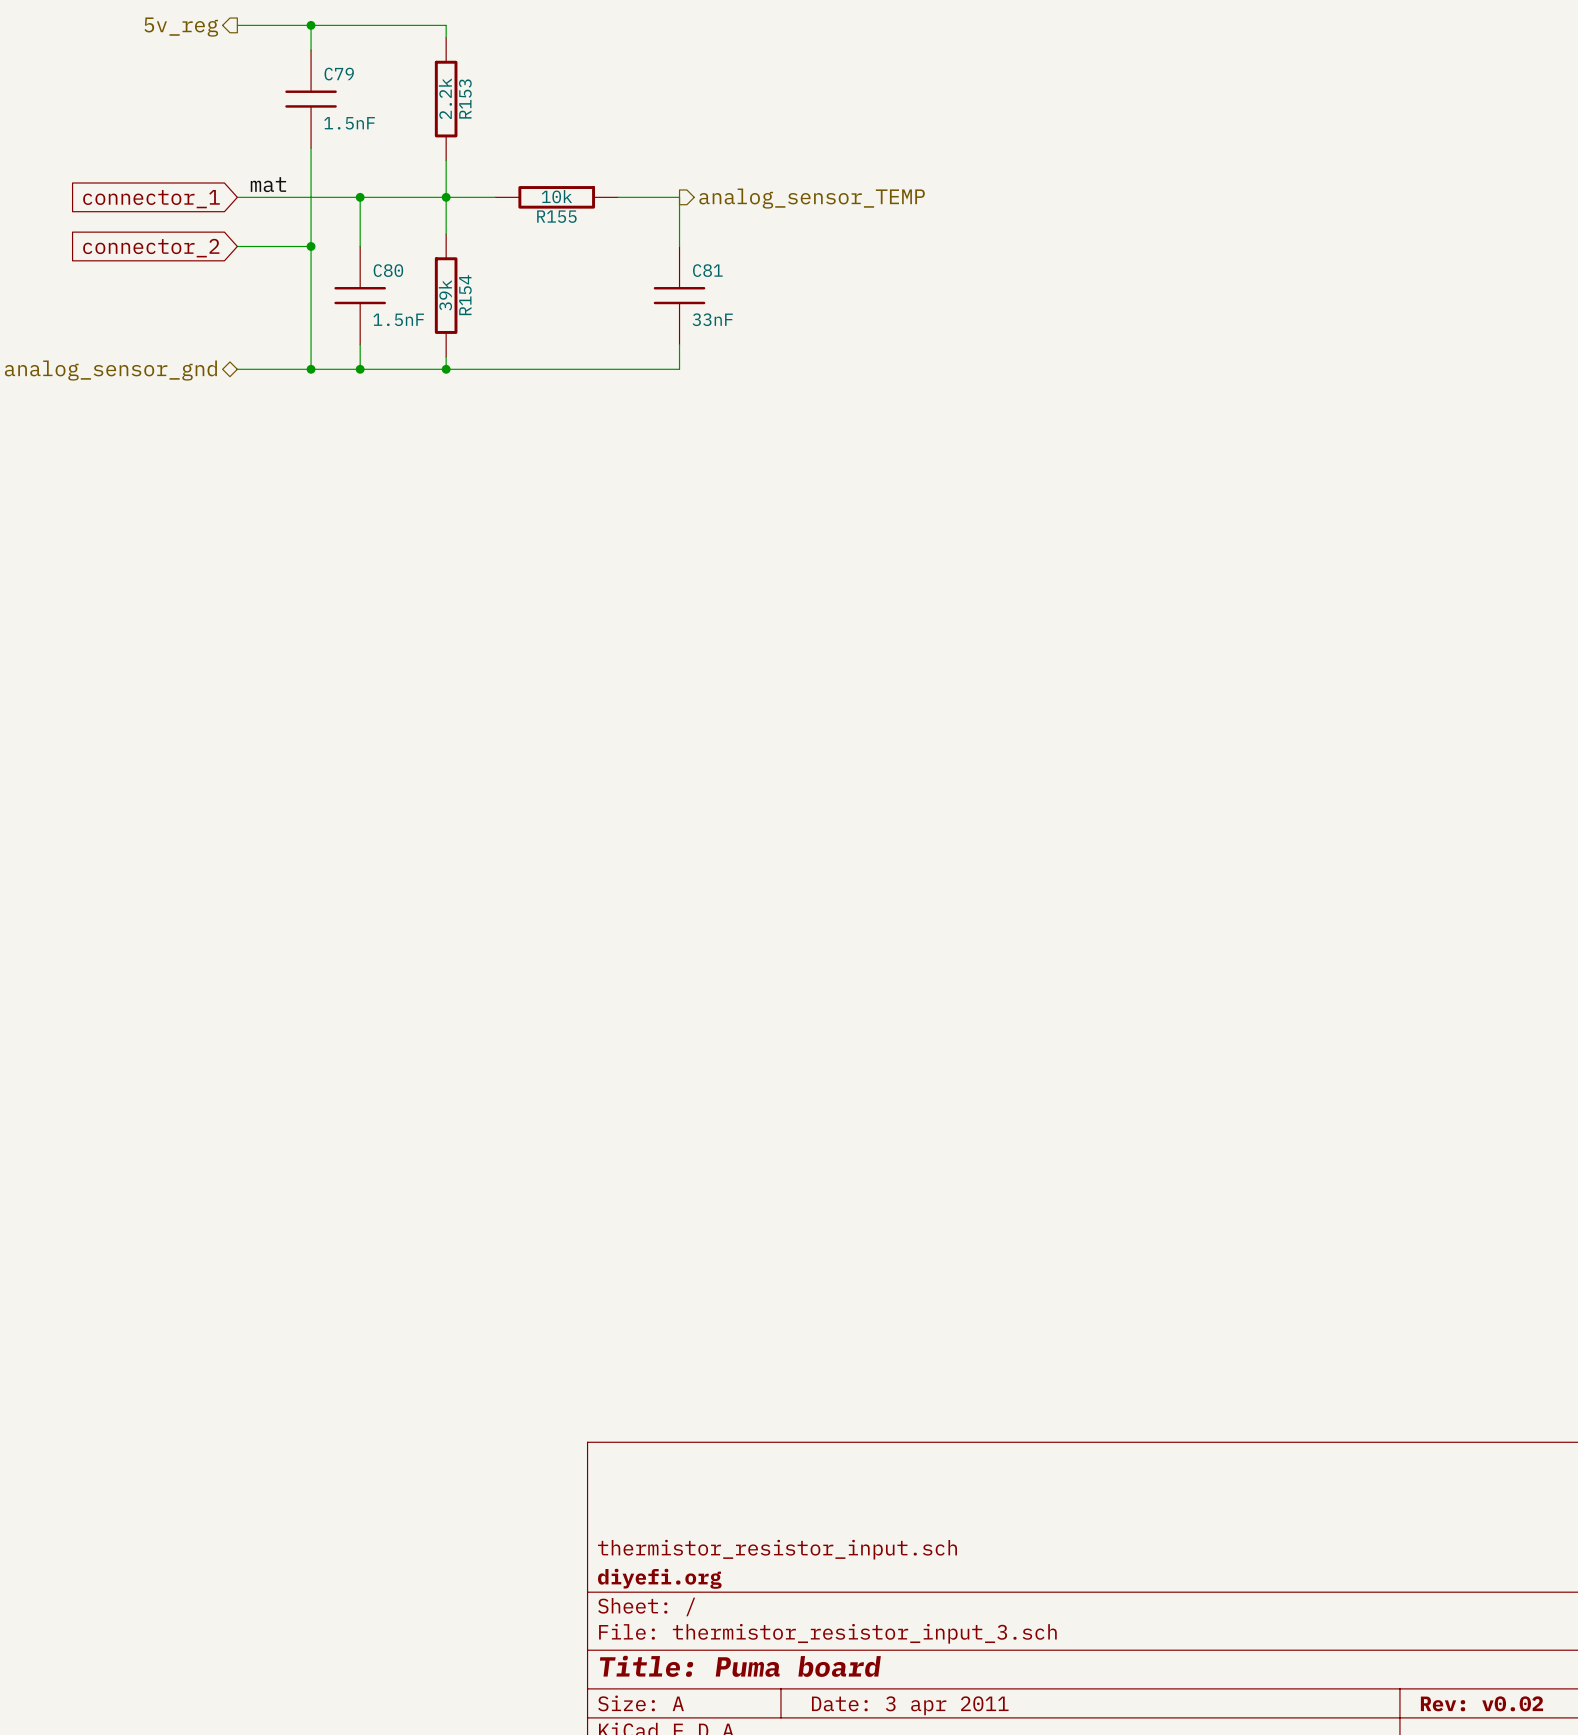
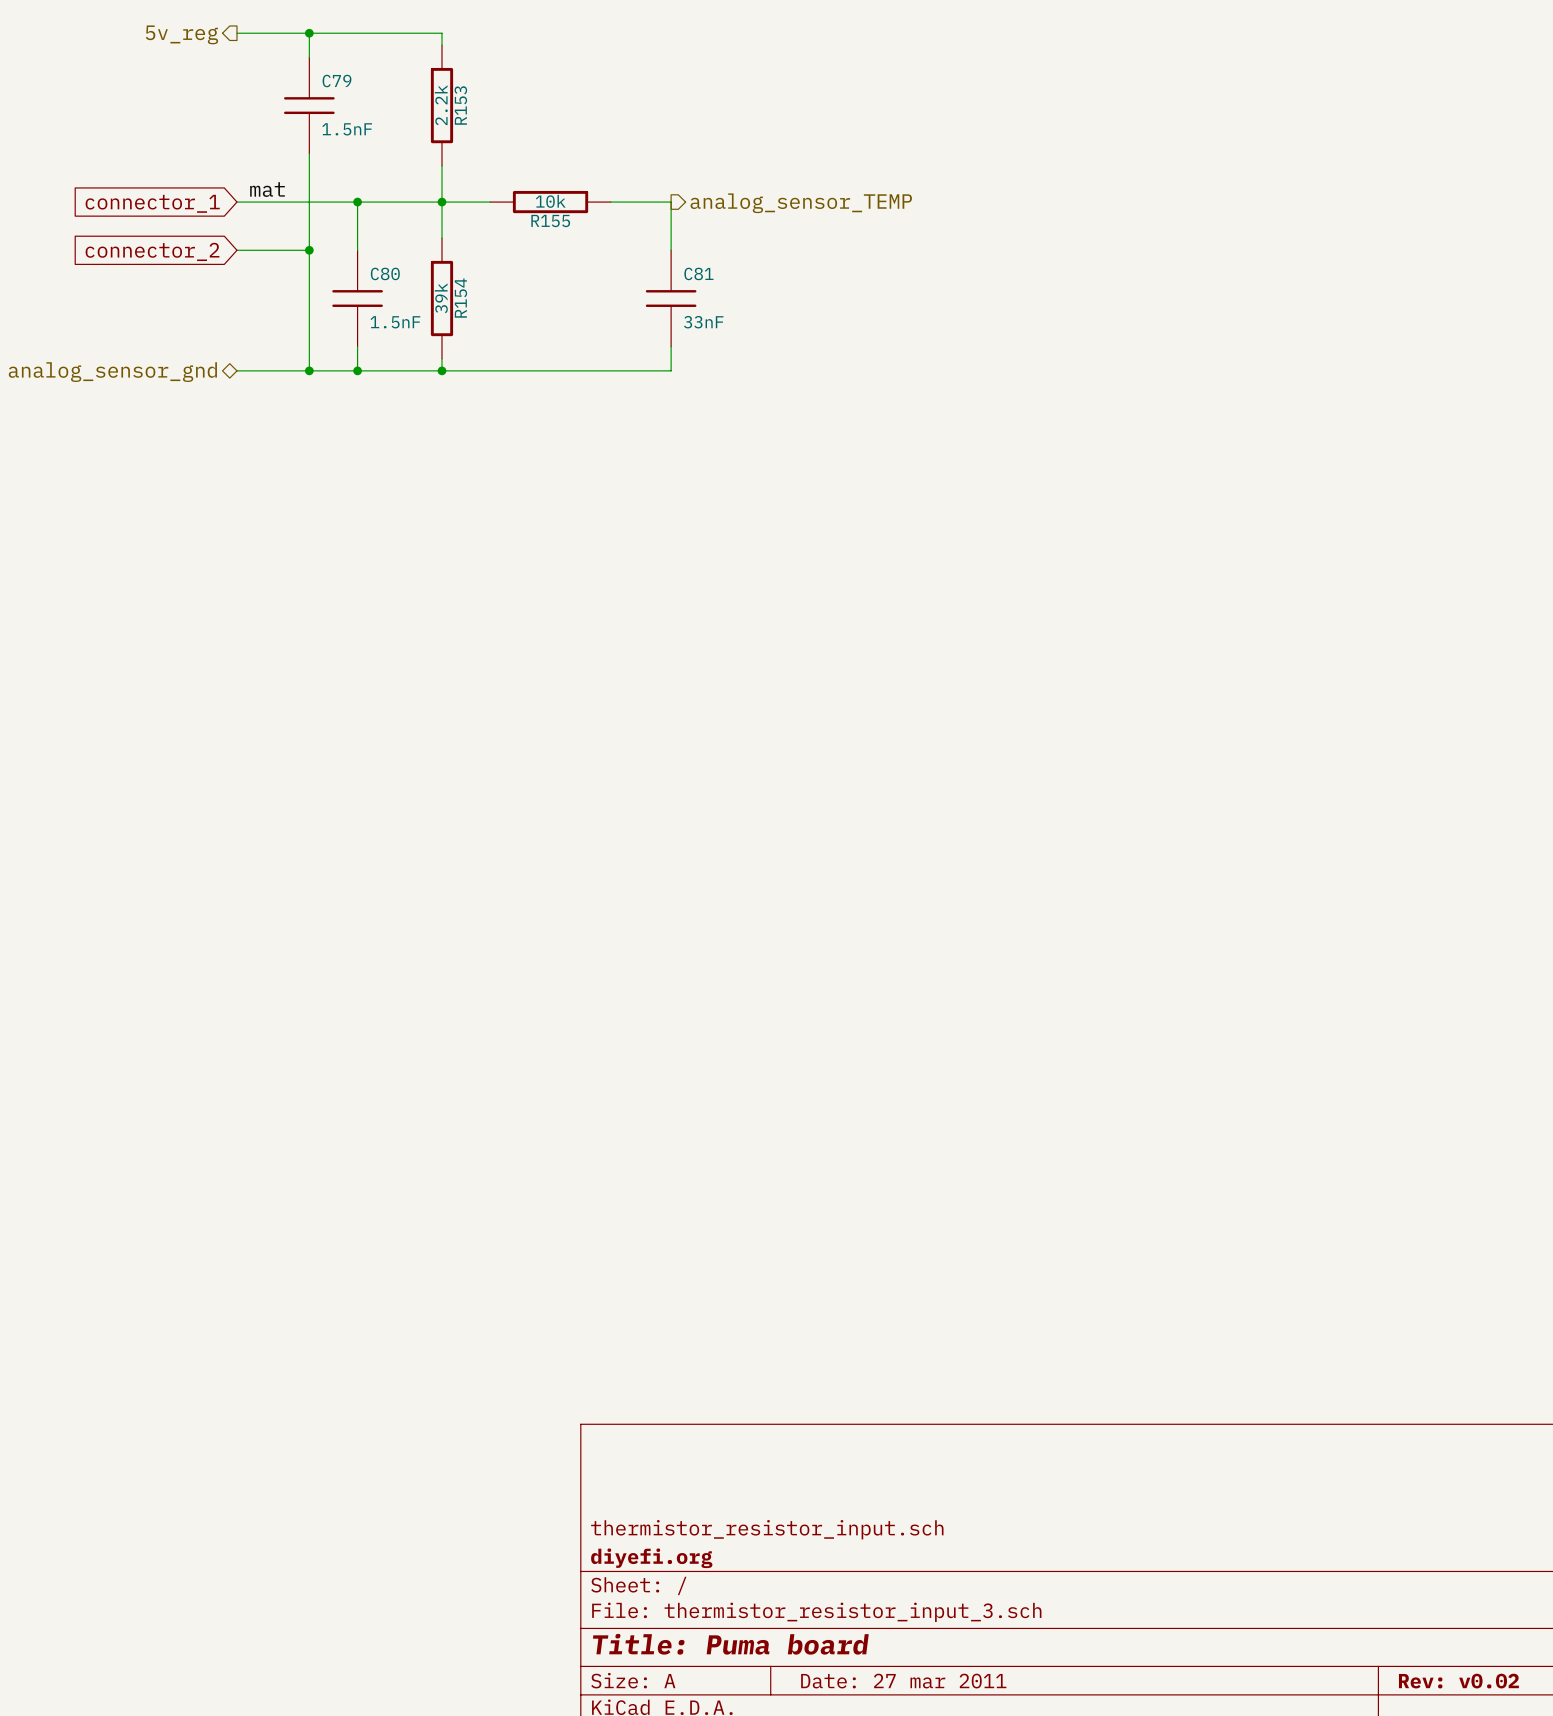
title block: Date: 3 apr 2011 (910, 1705) -> Date: 27 mar 2011 (903, 1681)

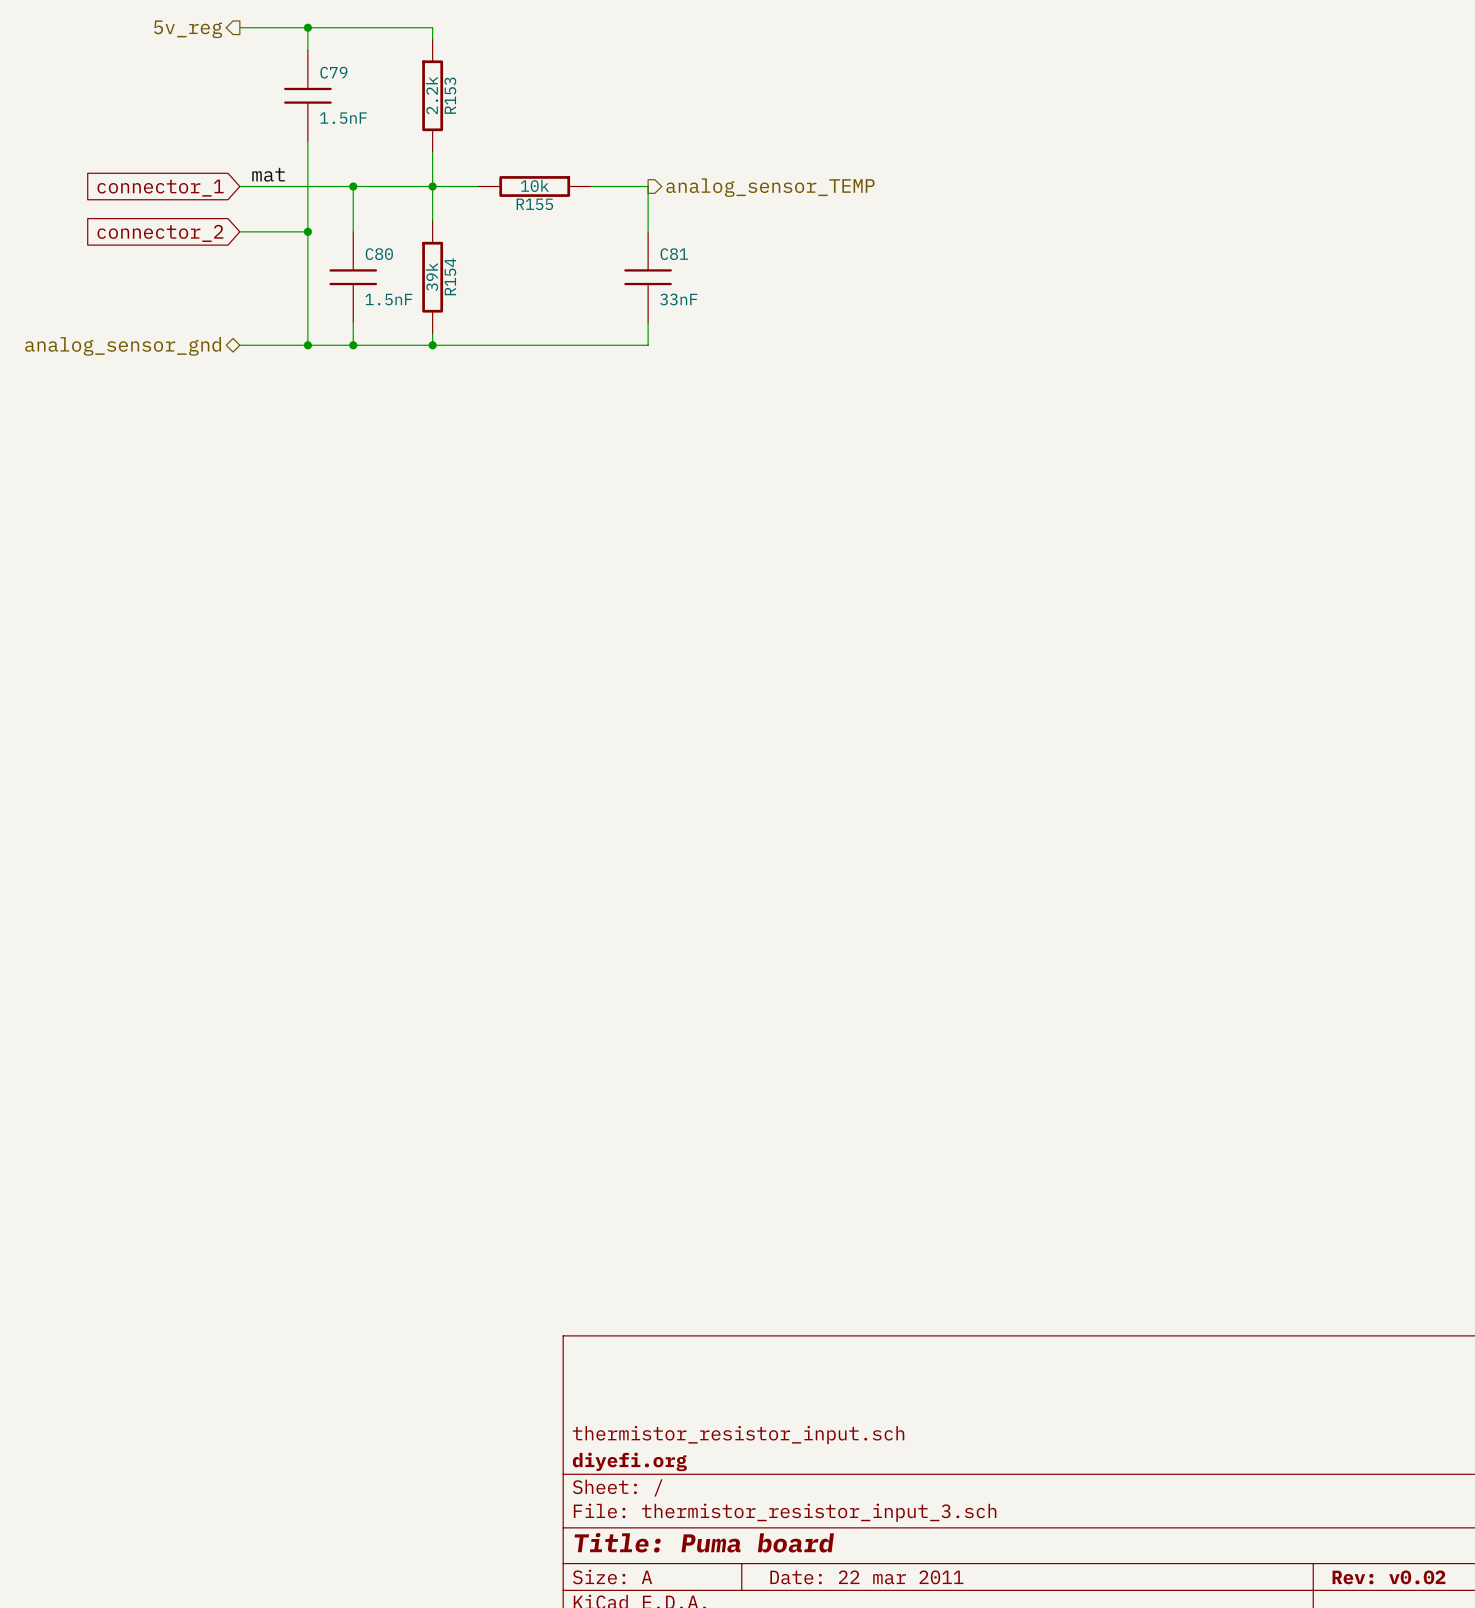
title block: Date: 27 mar 2011 (903, 1681) -> Date: 22 mar 2011 (866, 1577)

